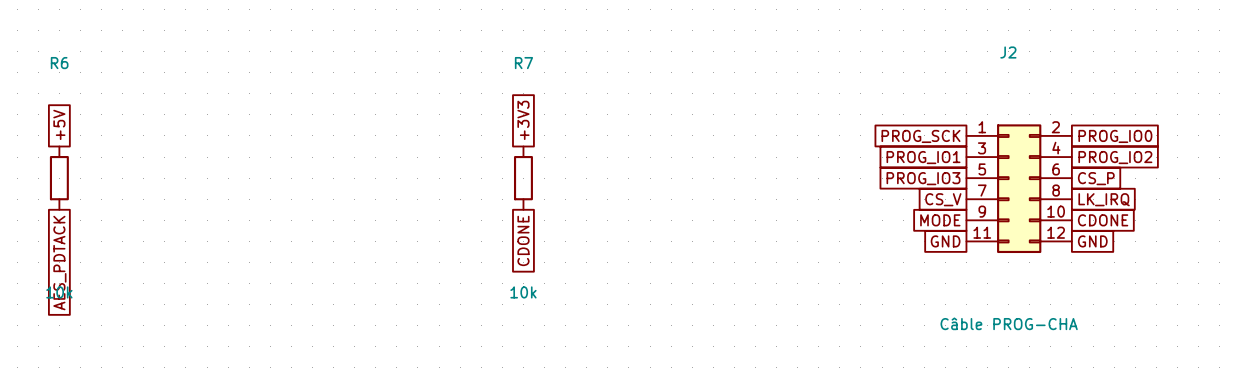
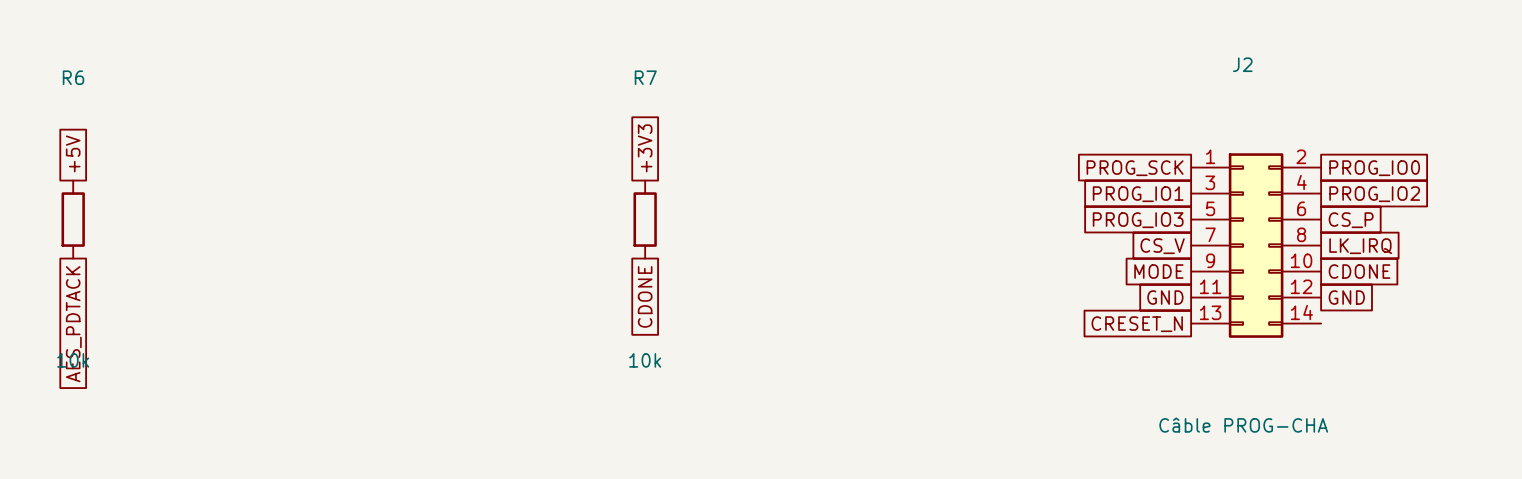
J2 symbol: [966, 124, 1072, 254] -> [1191, 153, 1322, 338]
global label: none -> CRESET_N (1137, 324)

